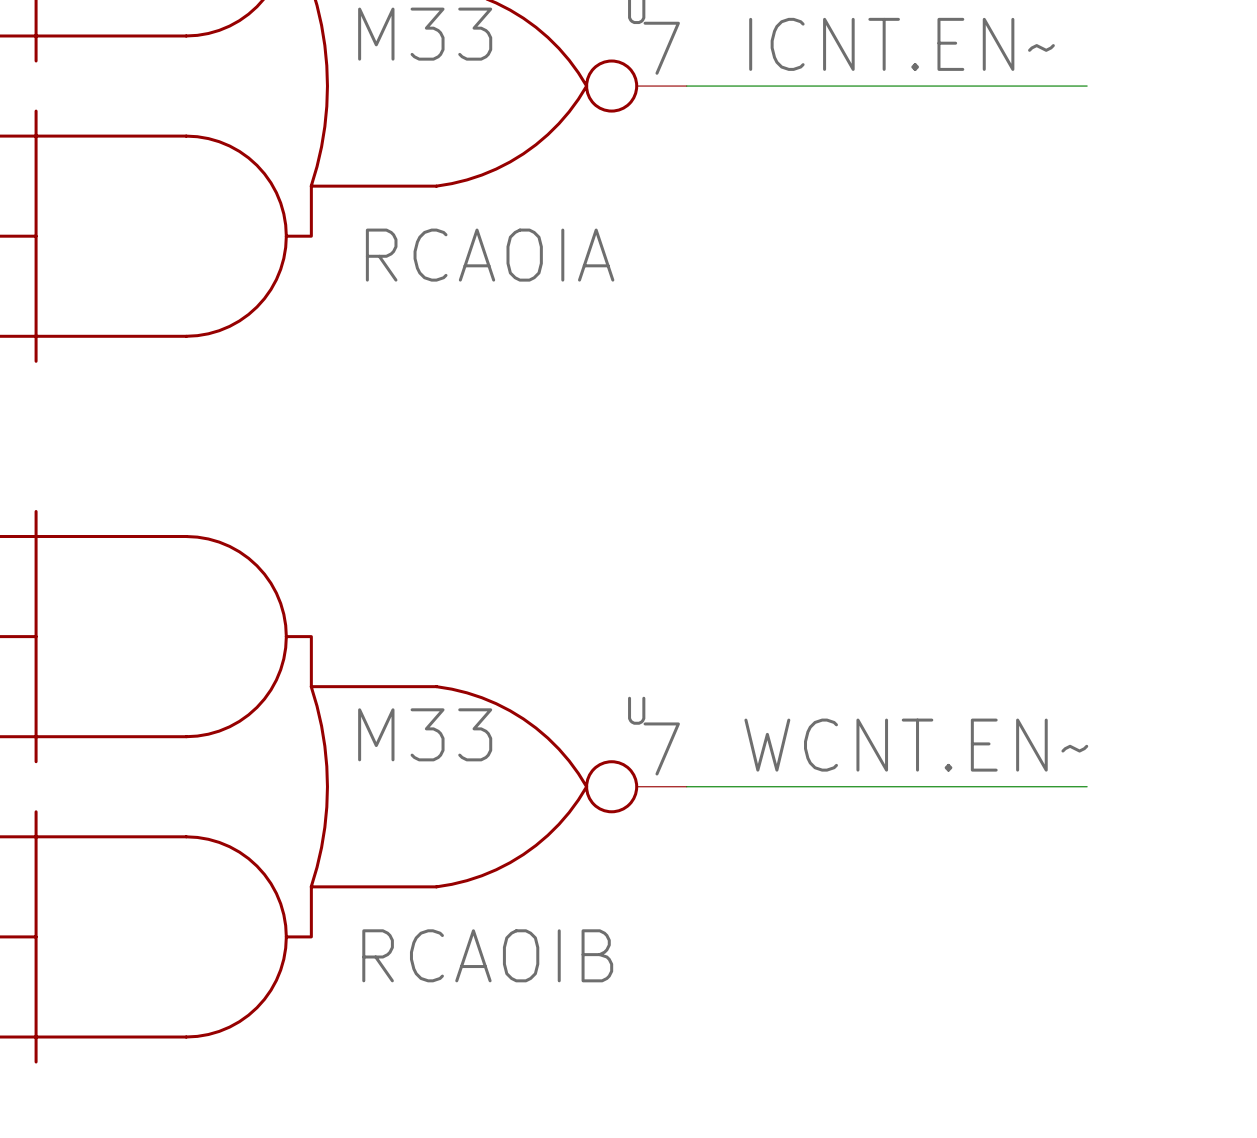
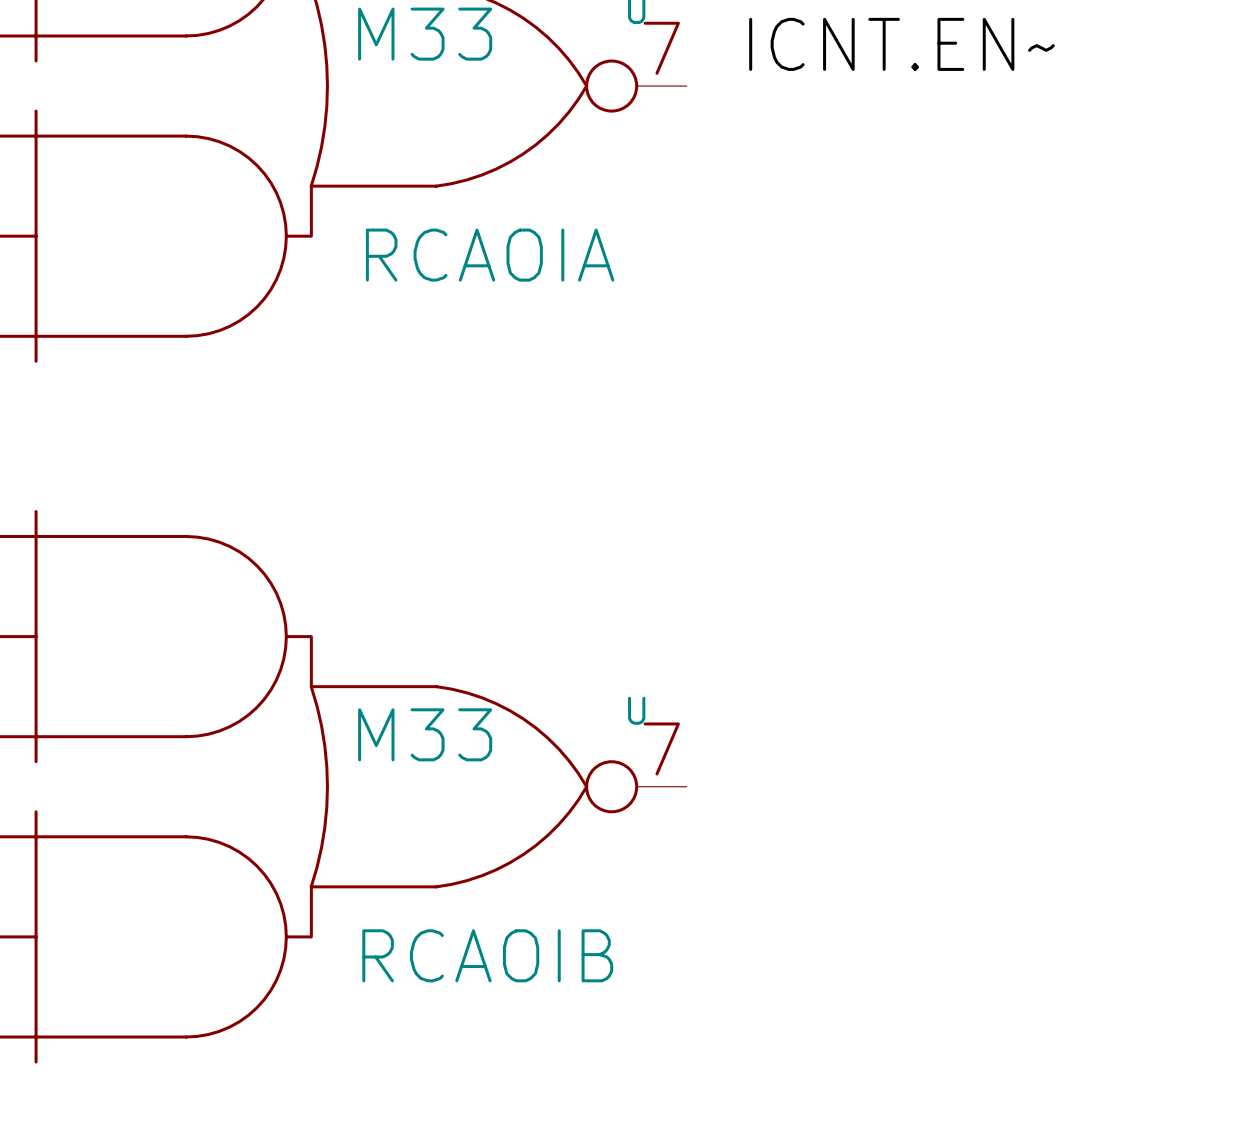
wire: (686, 86) (1087, 86) -> none
label: WCNT.EN~ (916, 745) -> none
wire: (686, 786) (1087, 786) -> none

